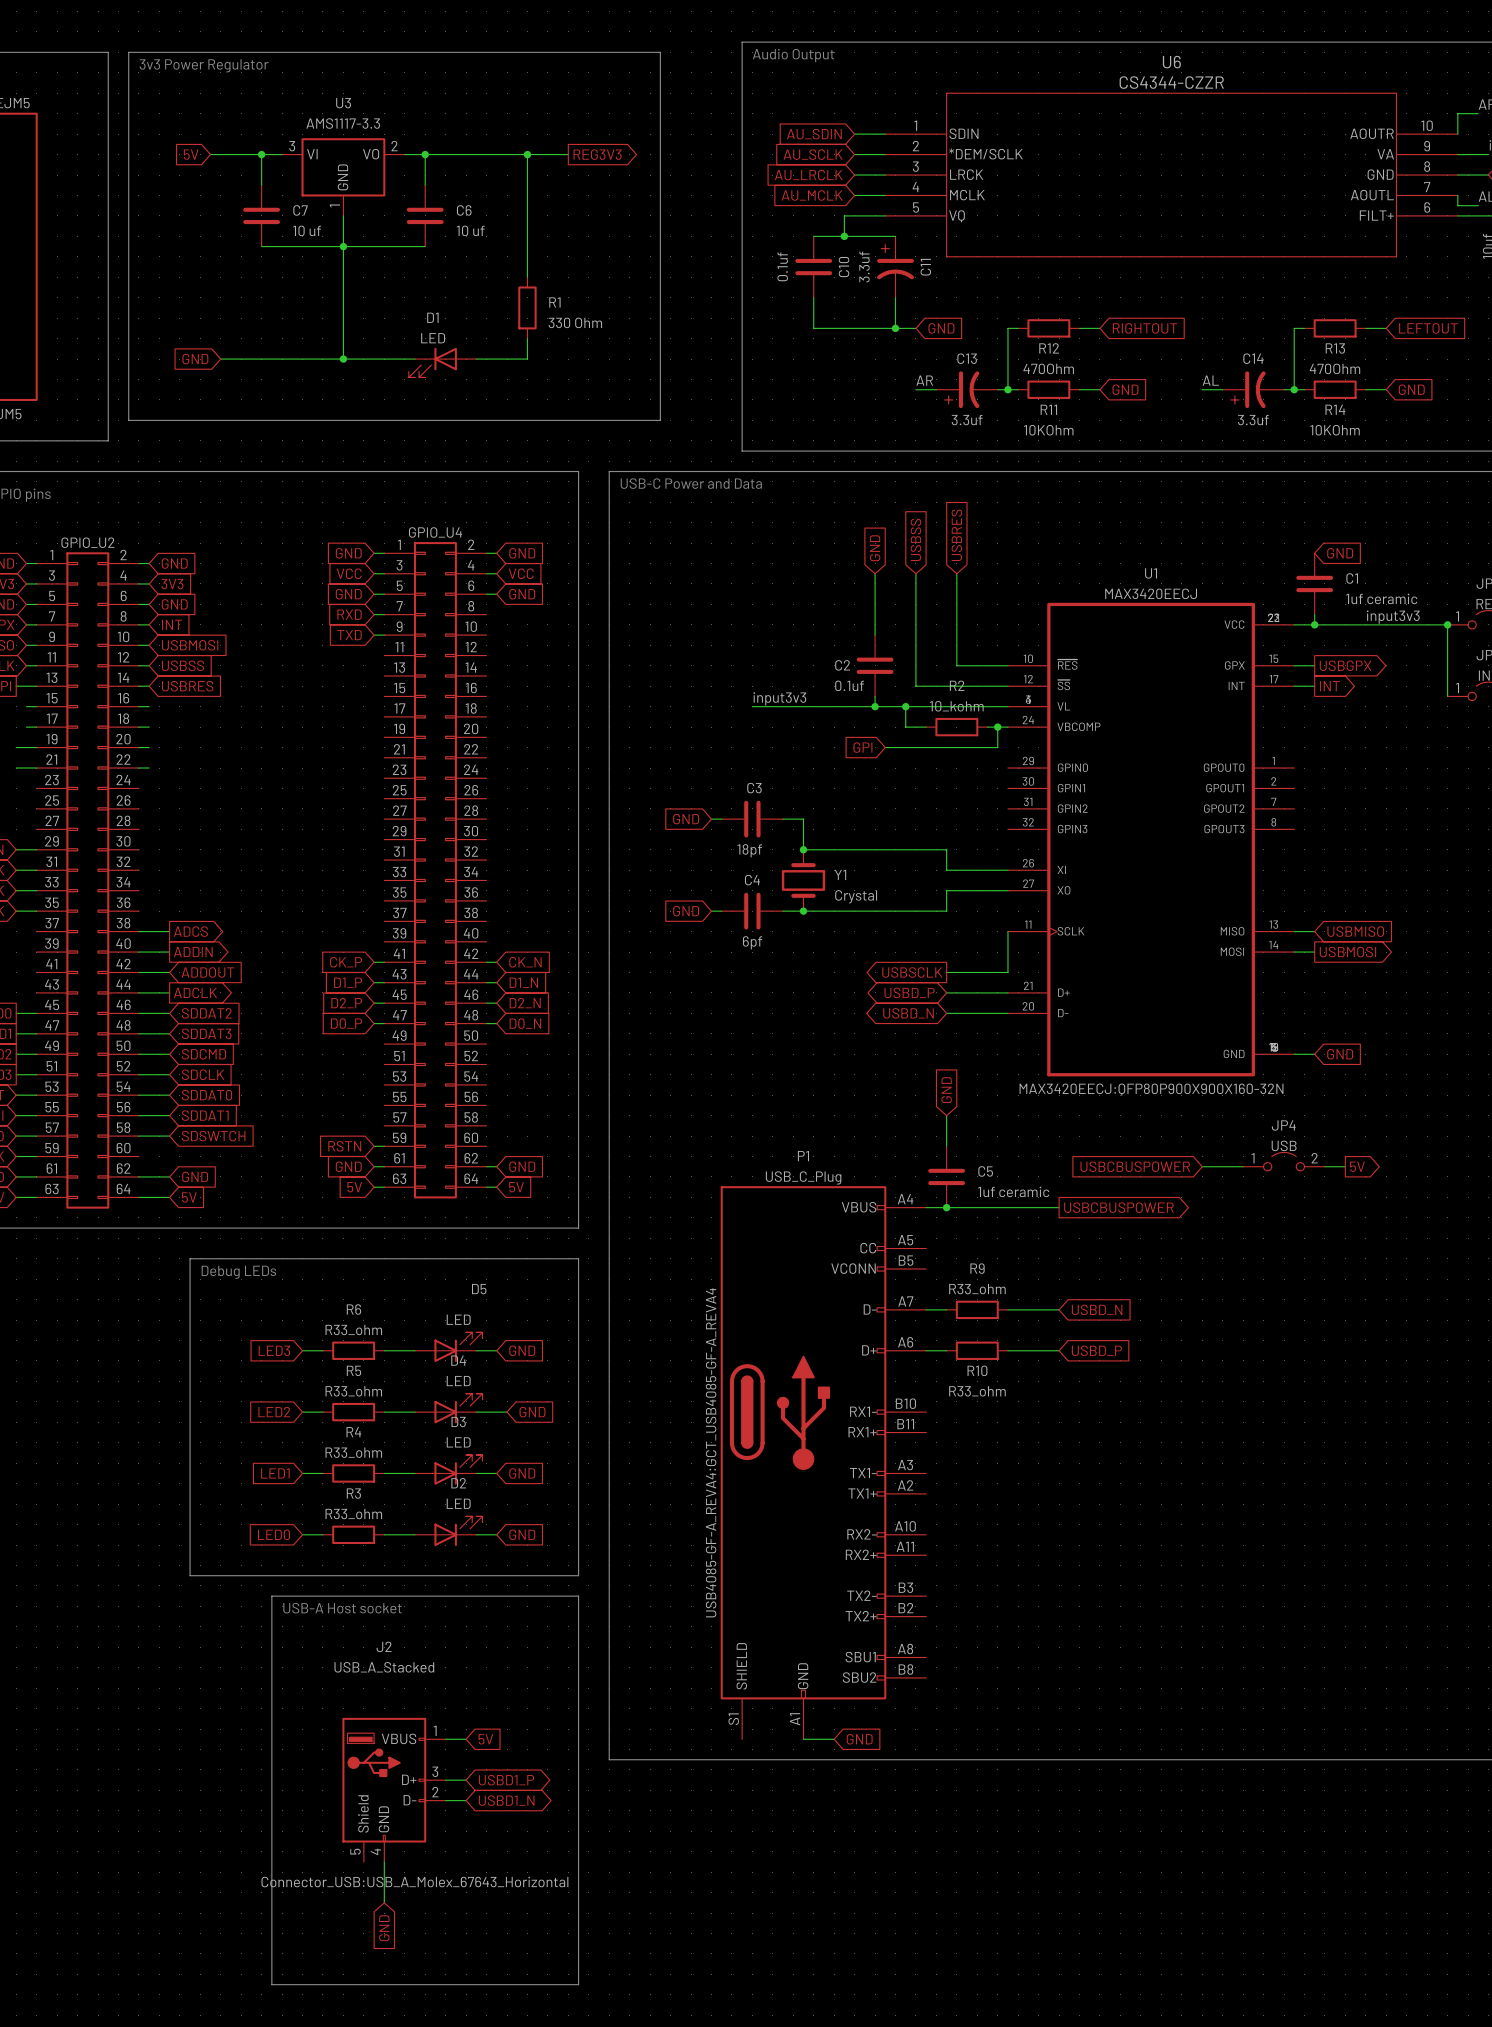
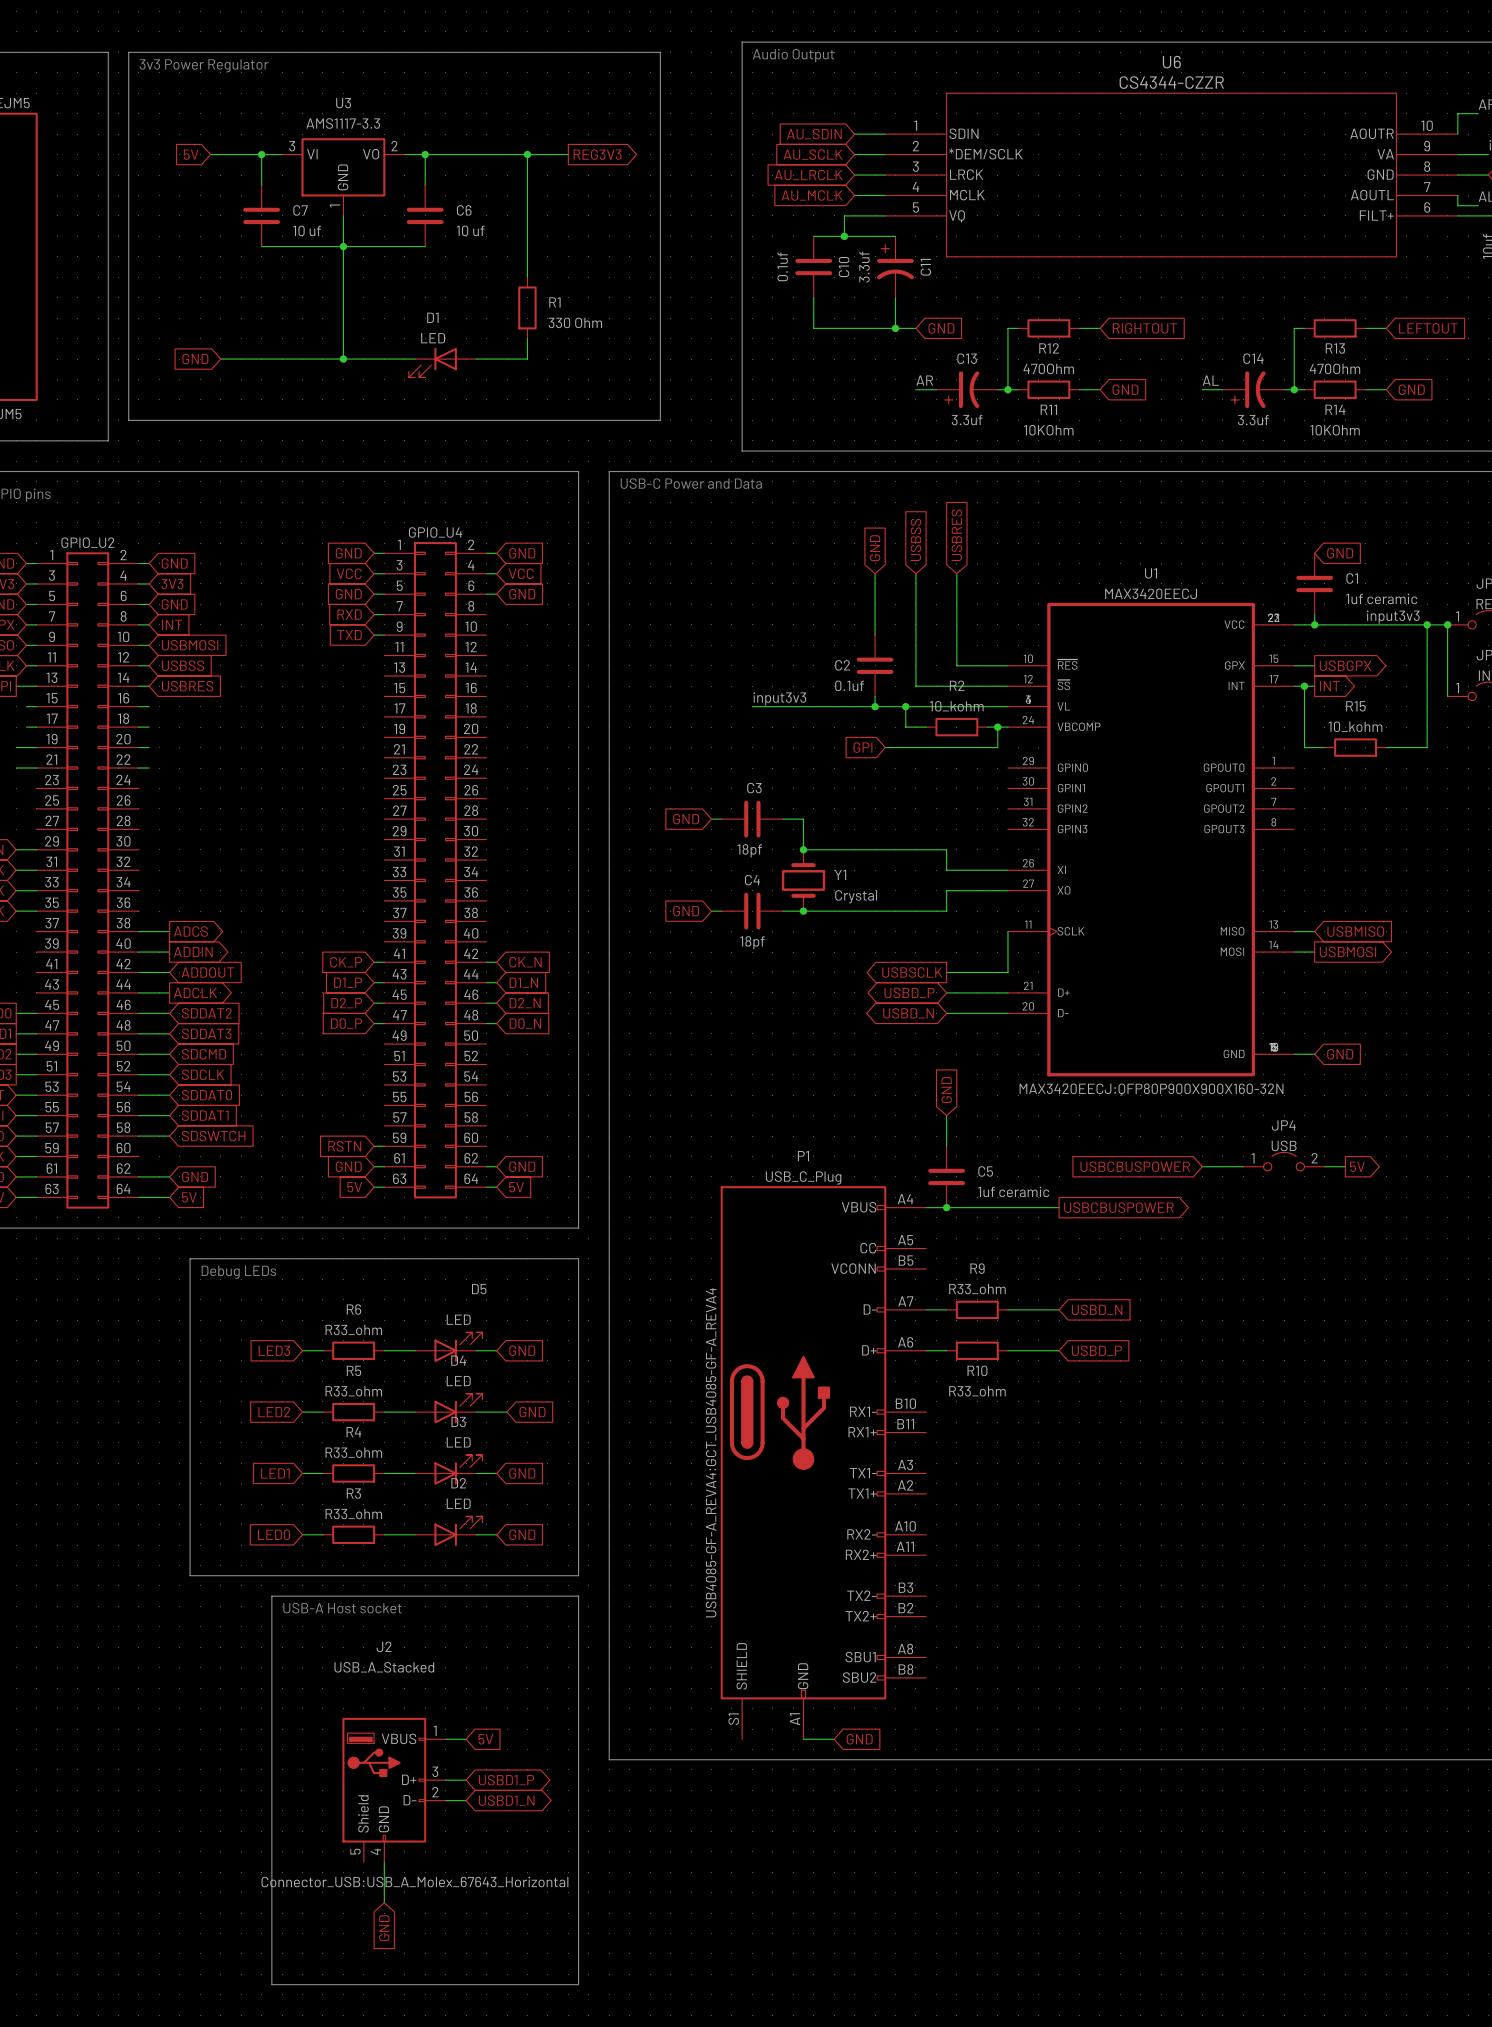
wire: none -> (1427, 624) (1427, 747) (1386, 747)
junction: none -> (1427, 624)
wire: none -> (1304, 686) (1304, 747) (1324, 747)
junction: none -> (1304, 686)
R15: none -> 10_kohm (1355, 747)
C4 value: 6pf (752, 942) -> 18pf (752, 942)

